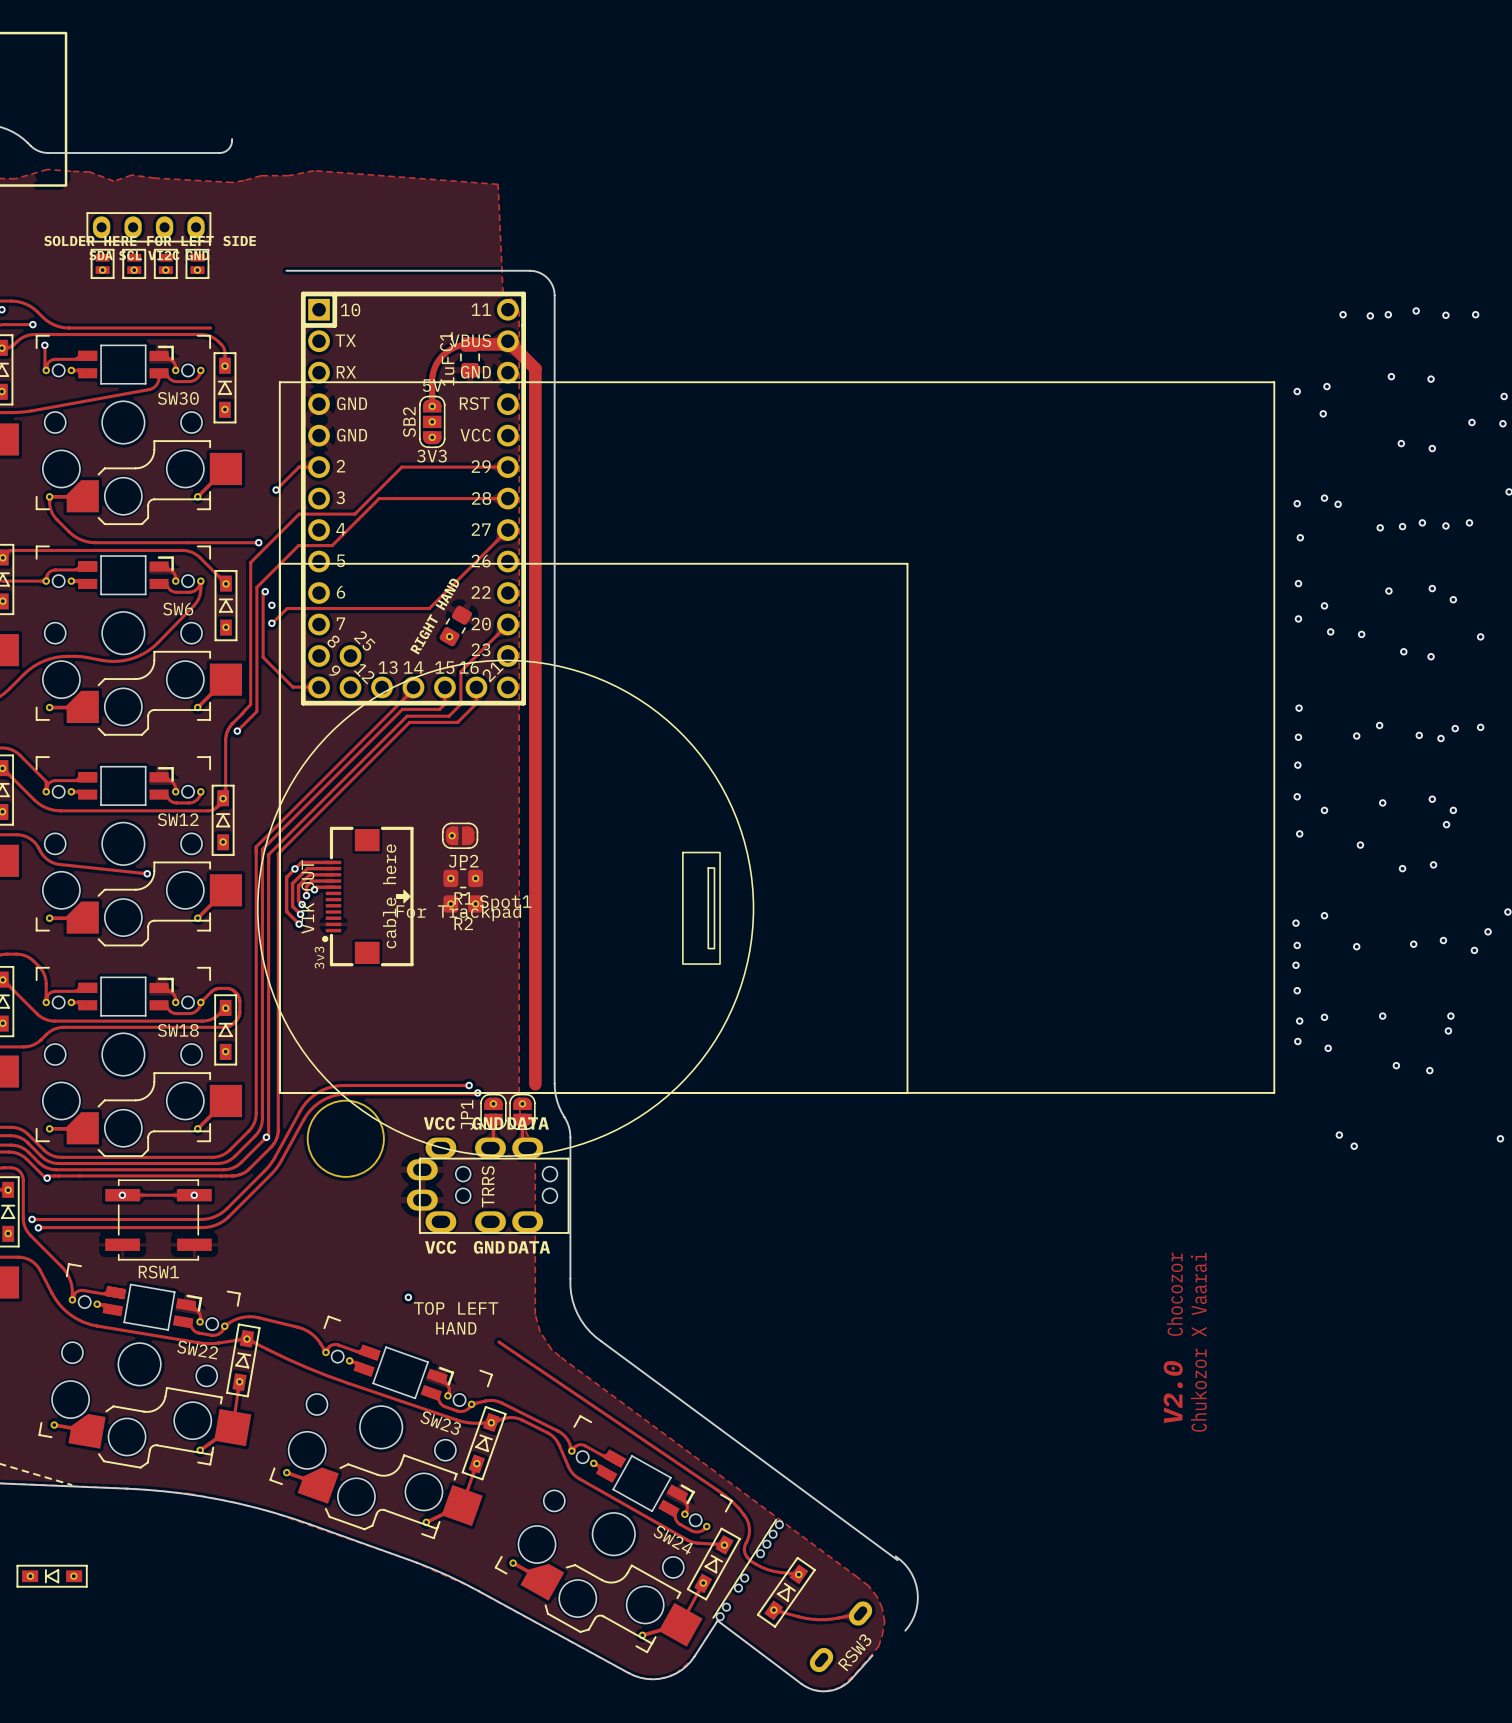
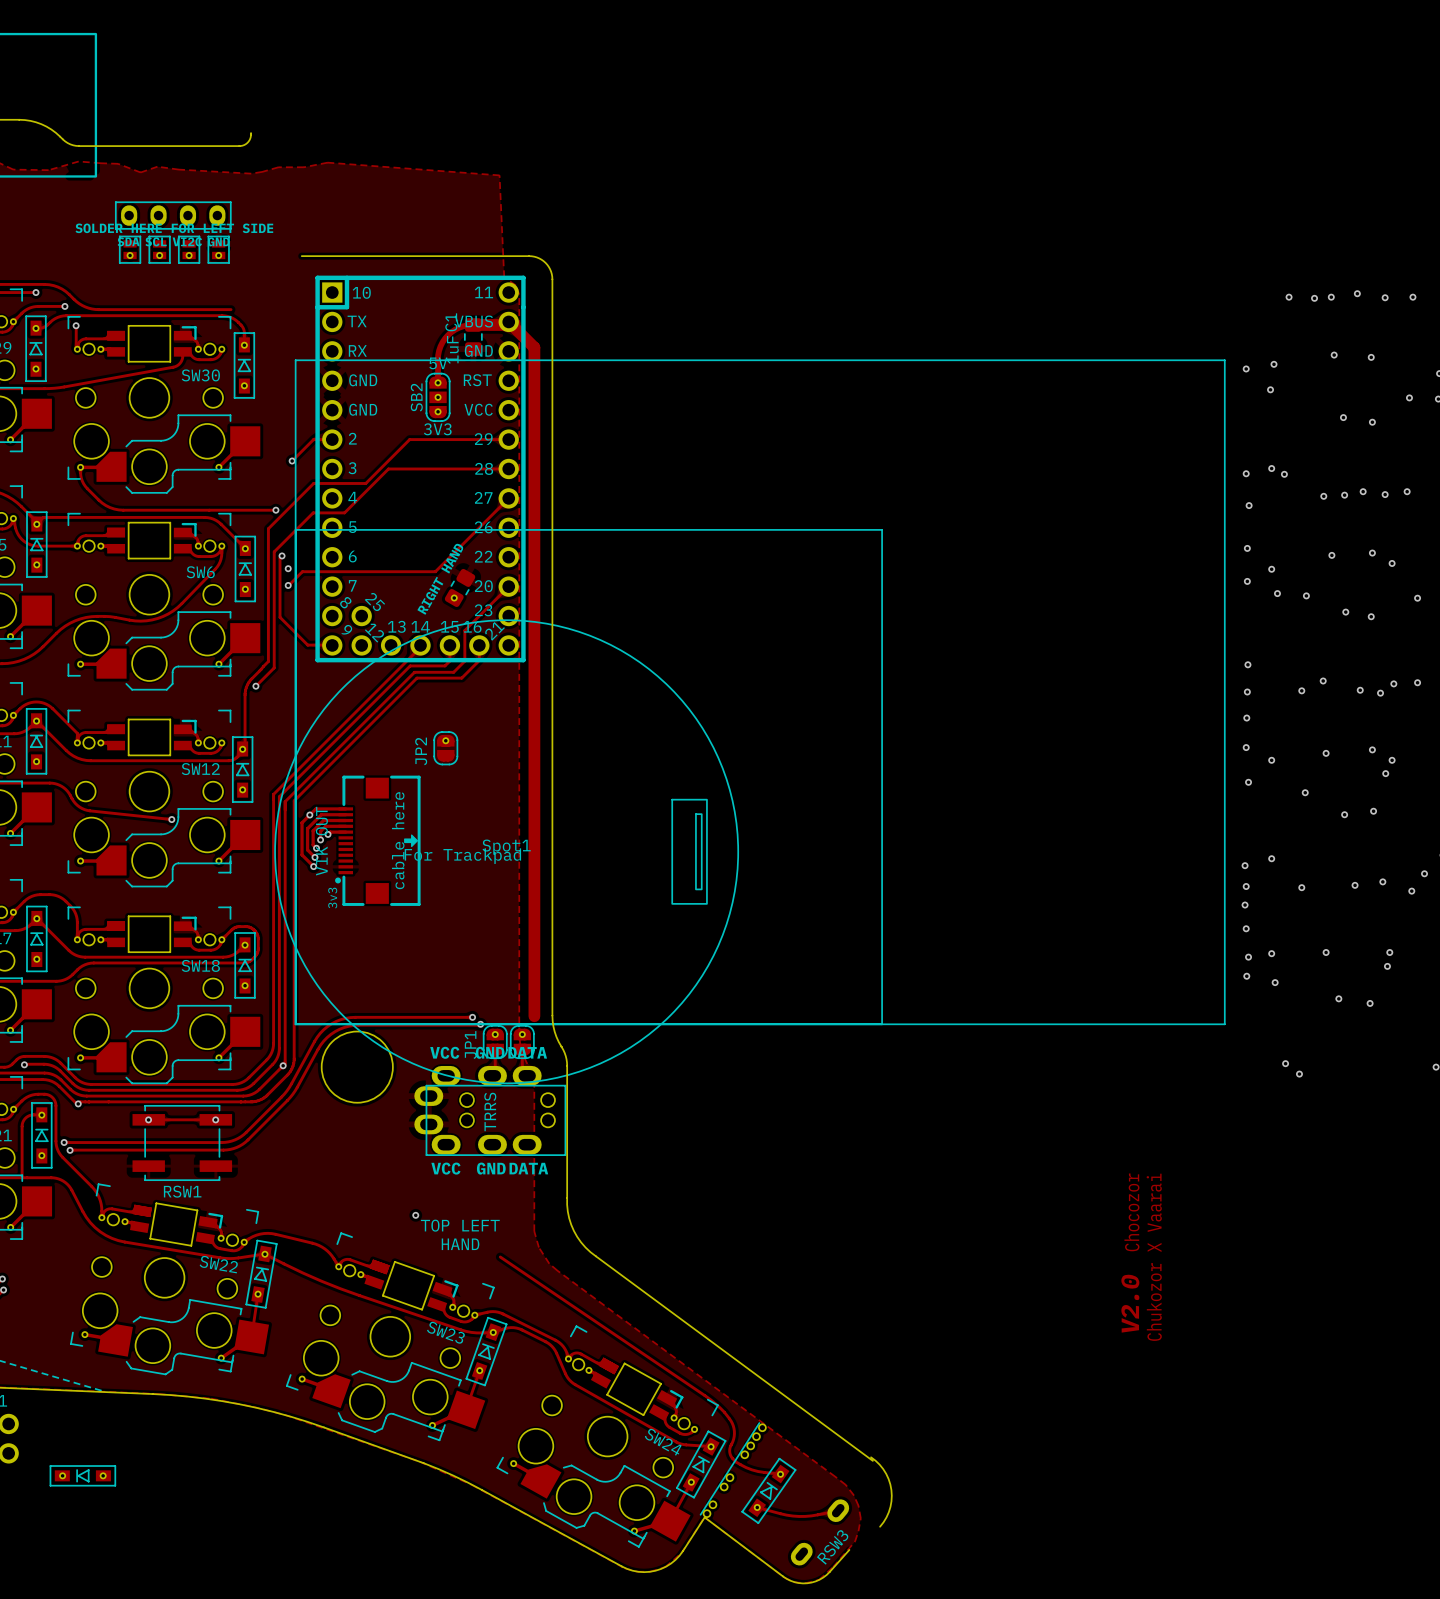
JP2 rotation: 0° (460, 835) -> 90° clockwise (445, 748)
JP2 position: (460, 835) -> (445, 748)
R1: (463, 878) -> none
R2: (463, 903) -> none

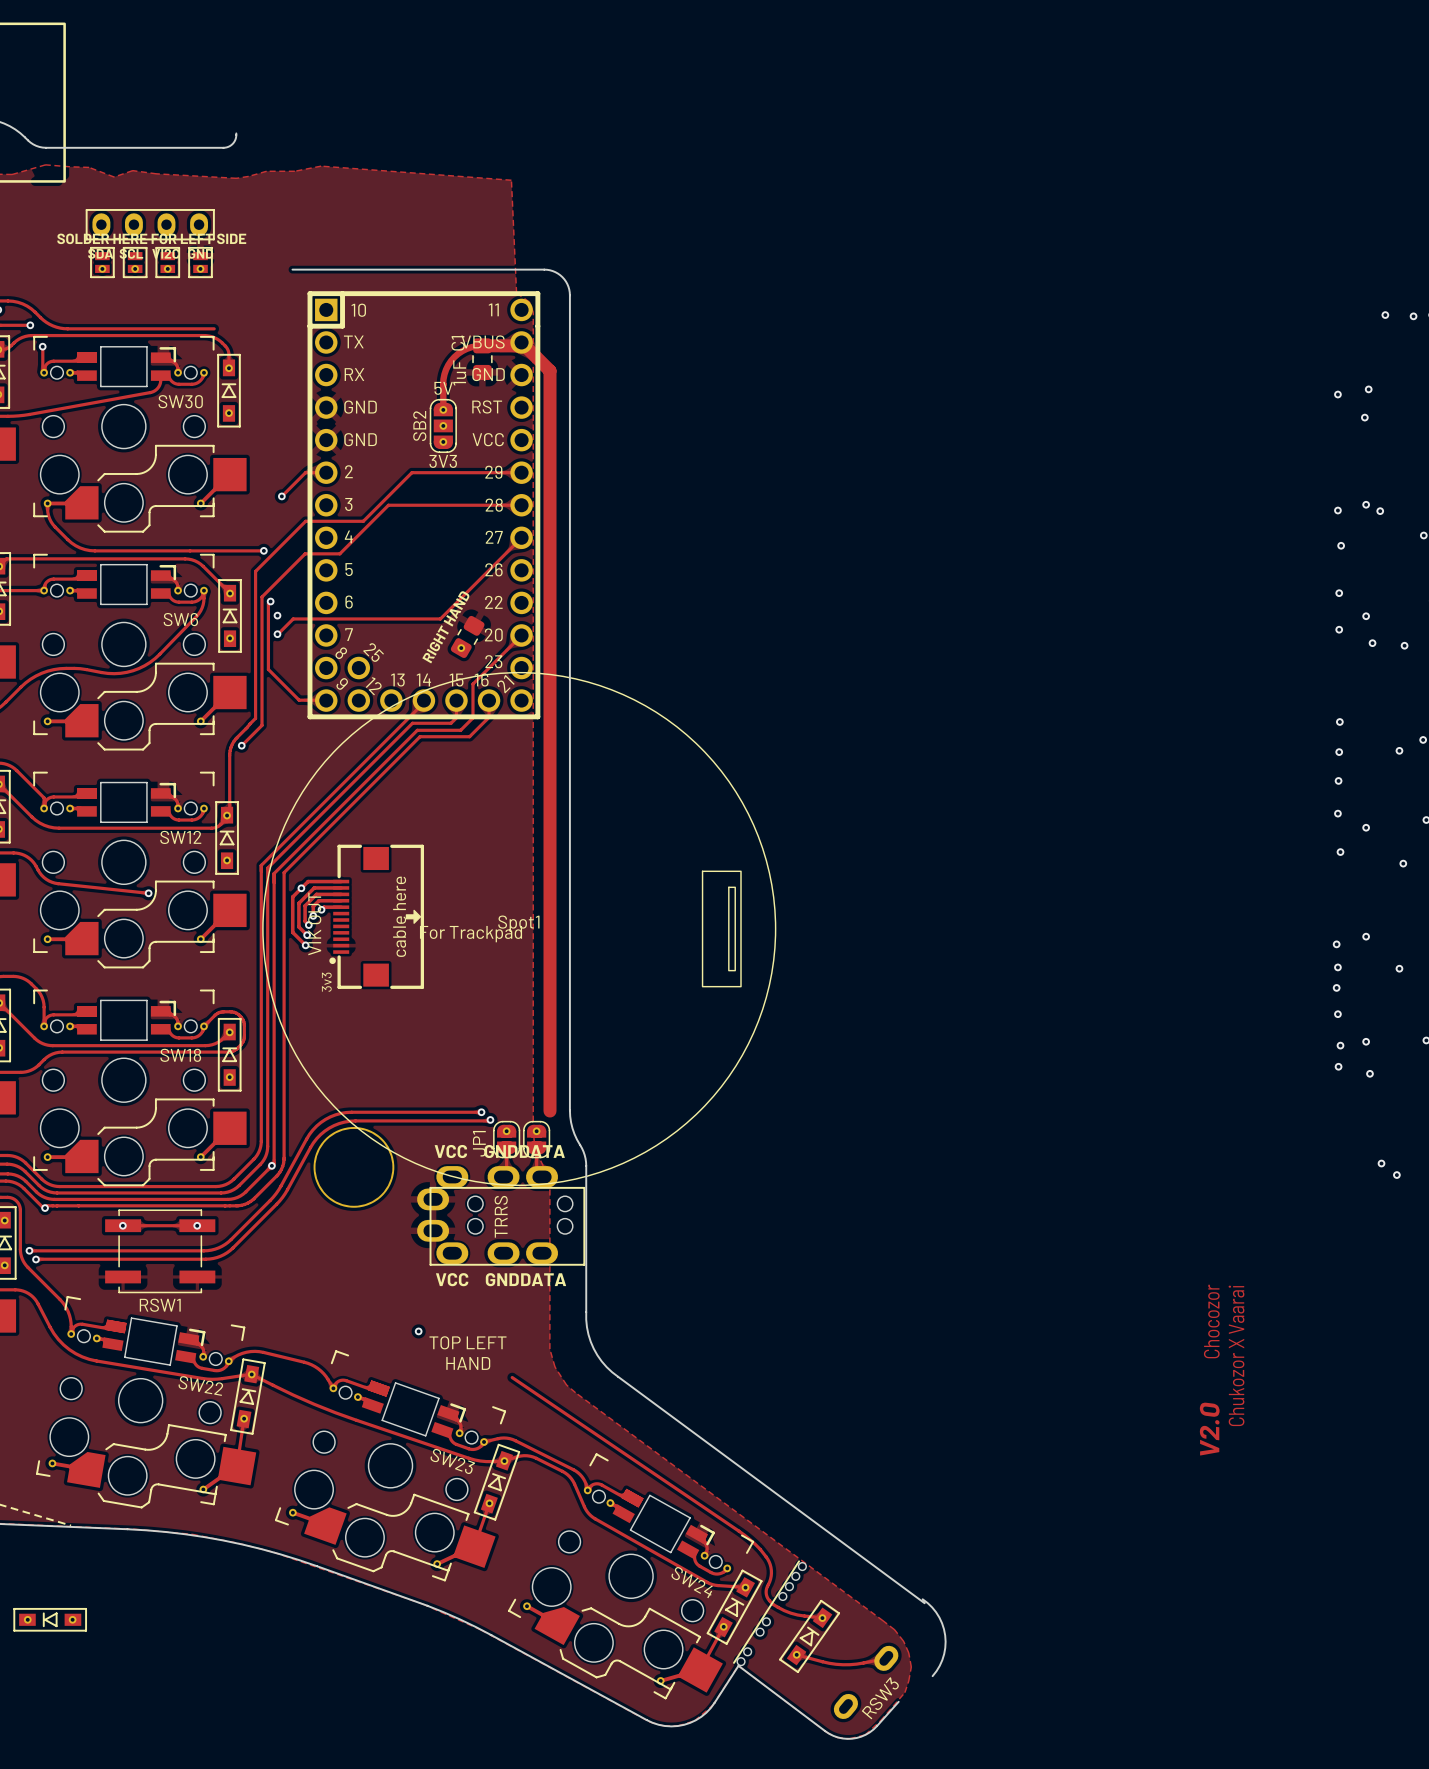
line: (295, 360) (1224, 360) (1224, 1024) (295, 1024) (295, 360) -> none
line: (295, 529) (882, 529) (882, 1024) -> none
JP2: (445, 748) -> none

